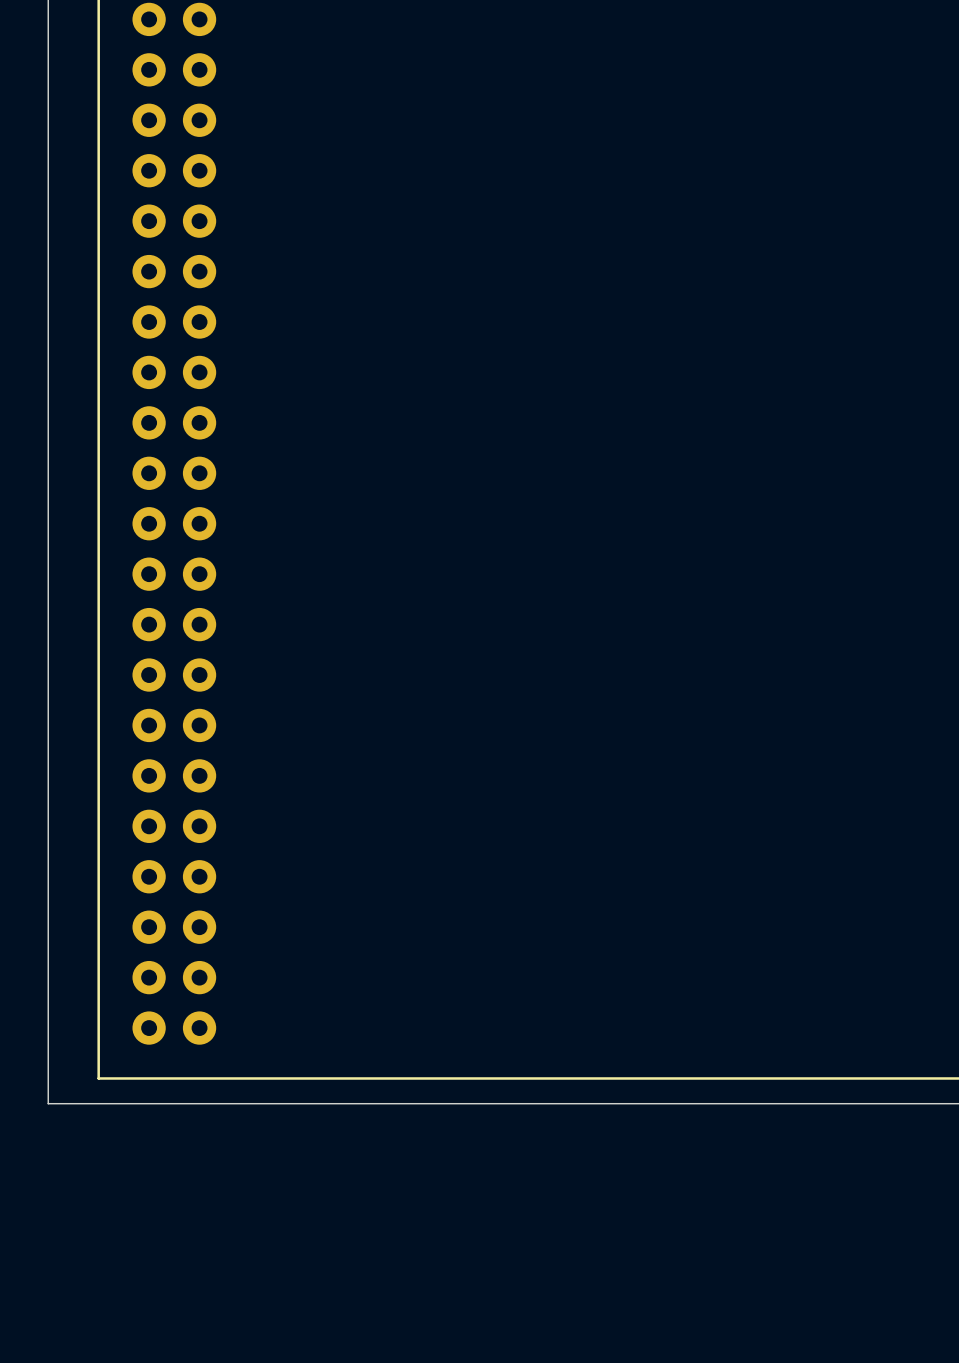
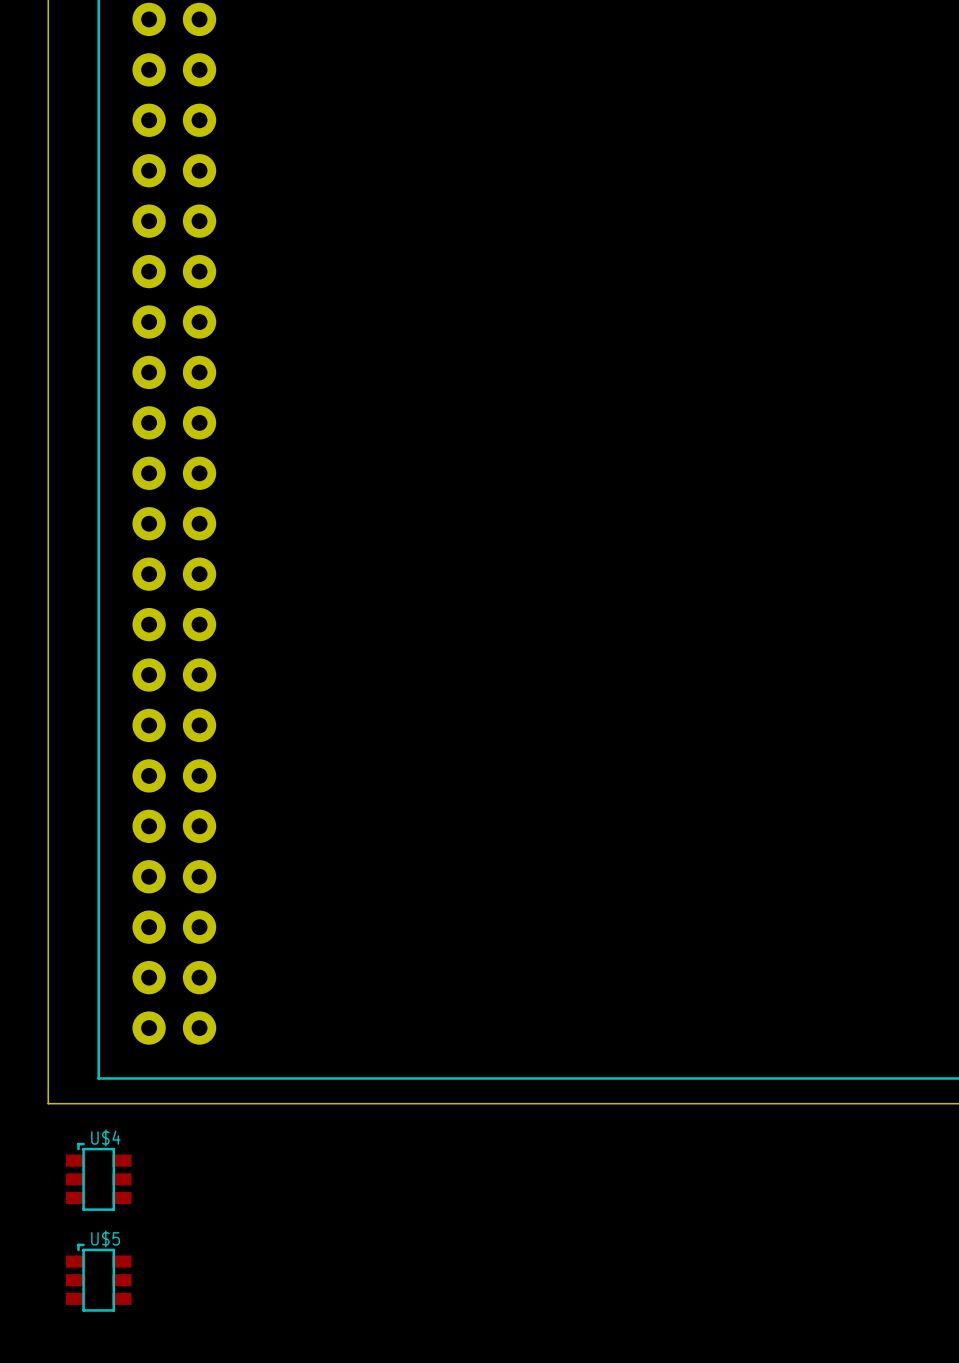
U$4: none -> (98, 1176)
U$5: none -> (98, 1277)

